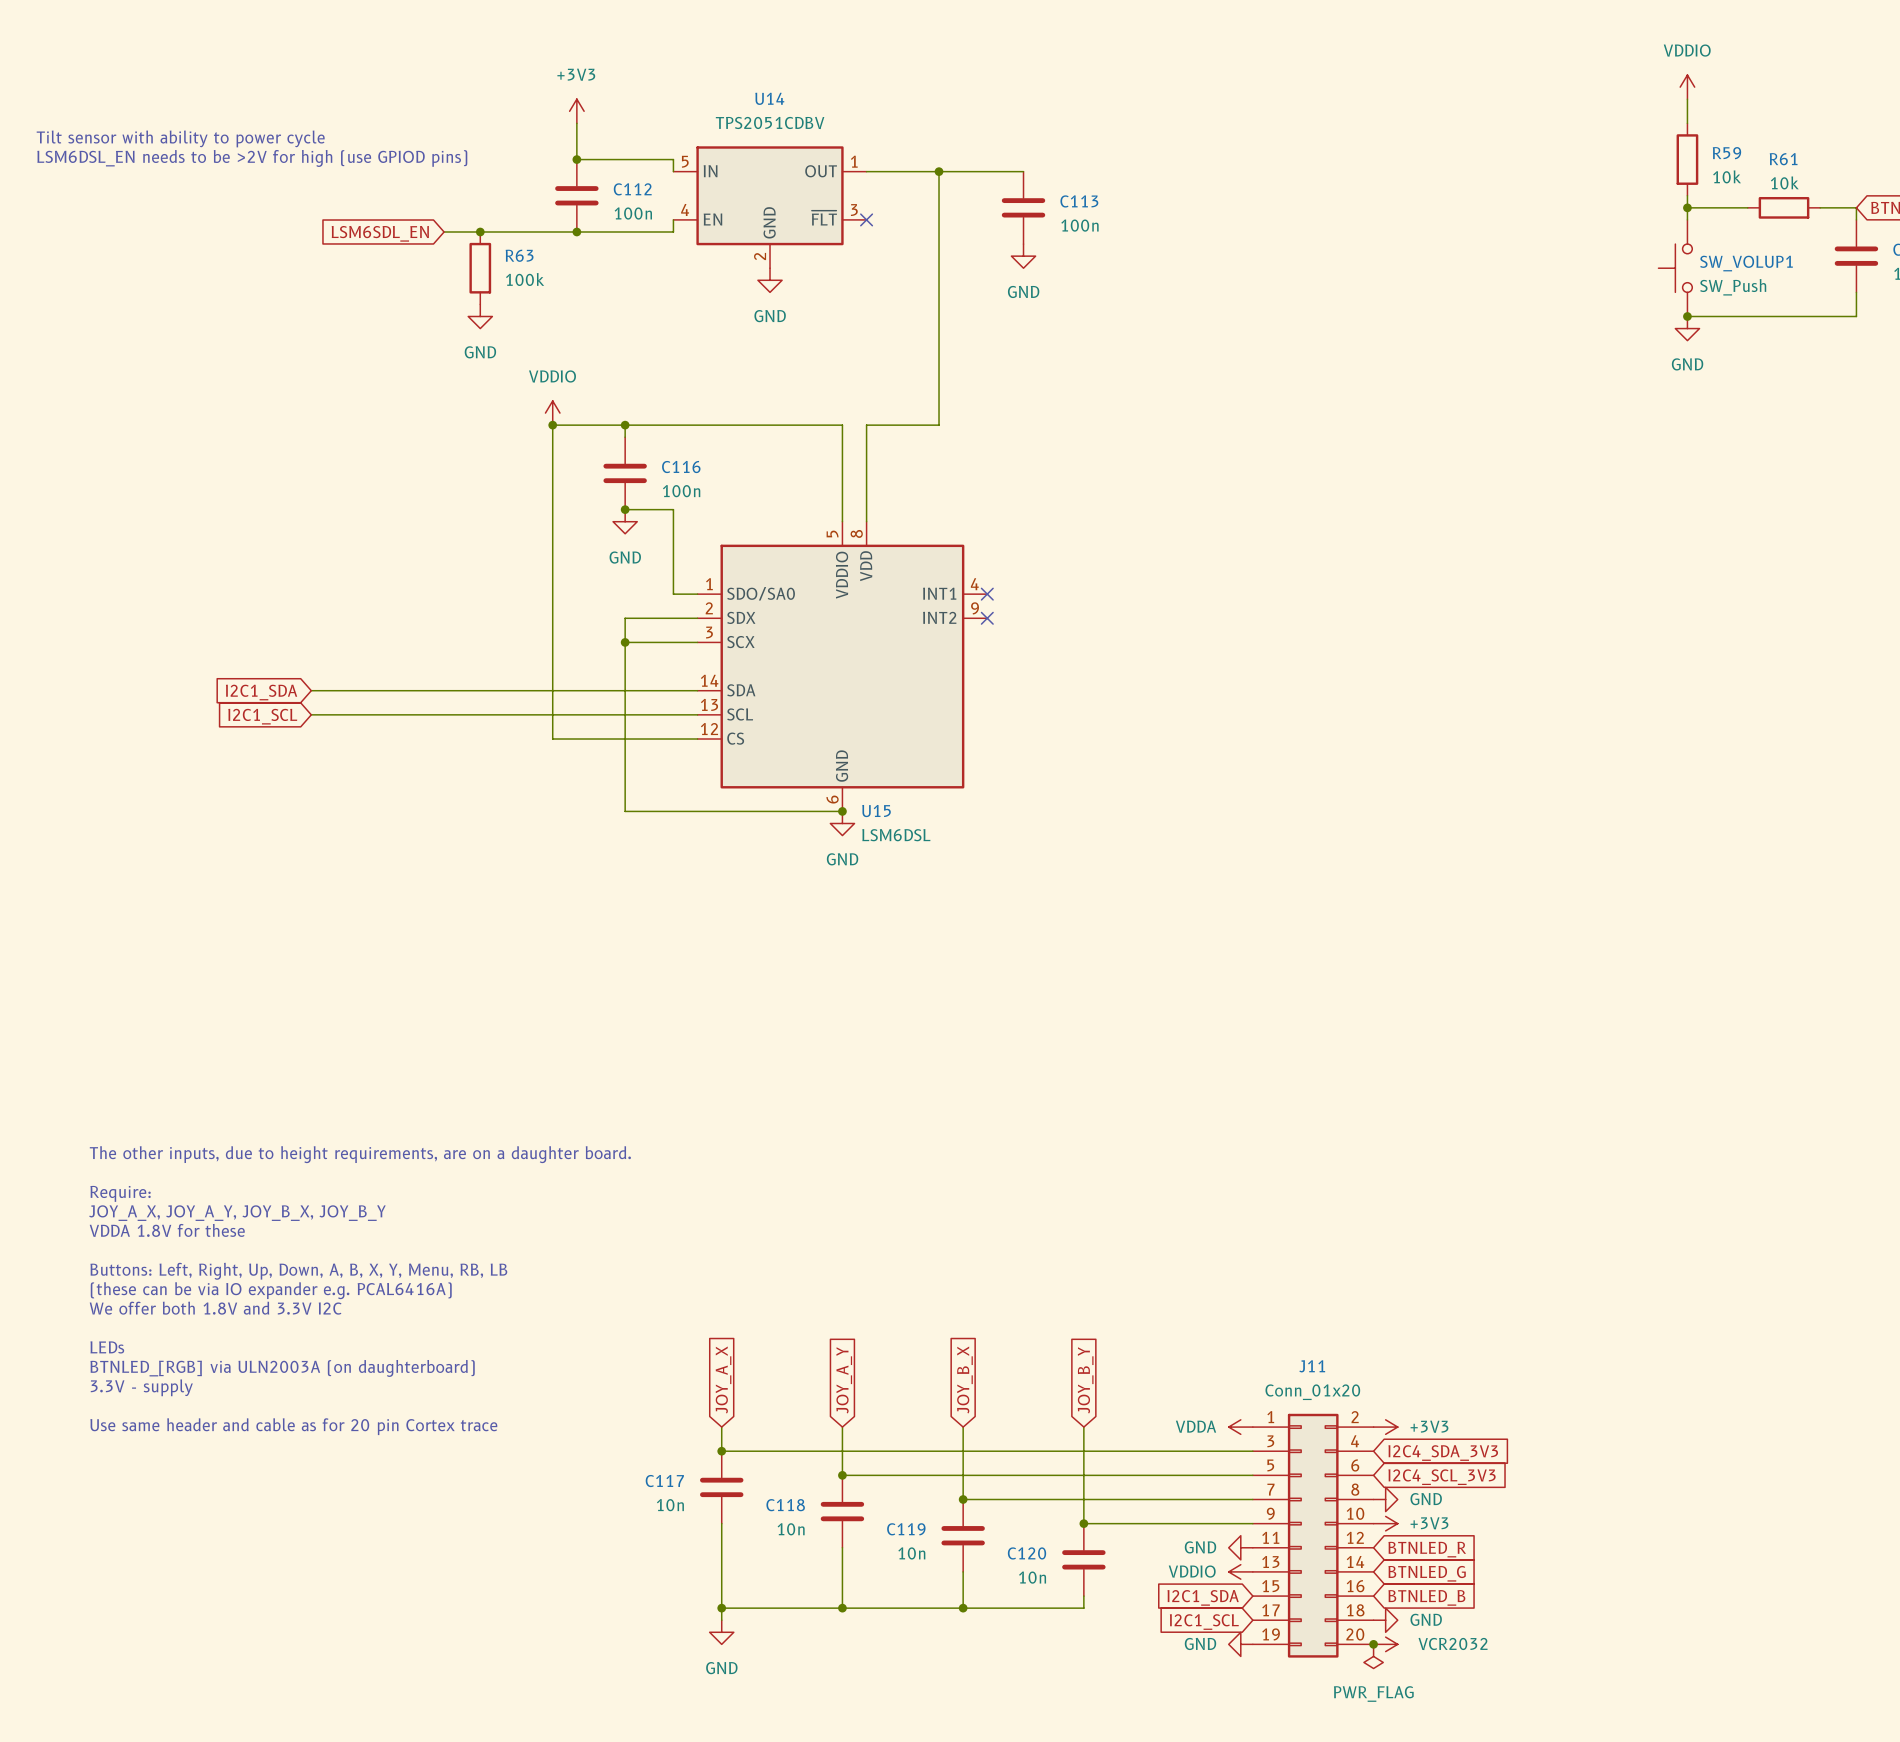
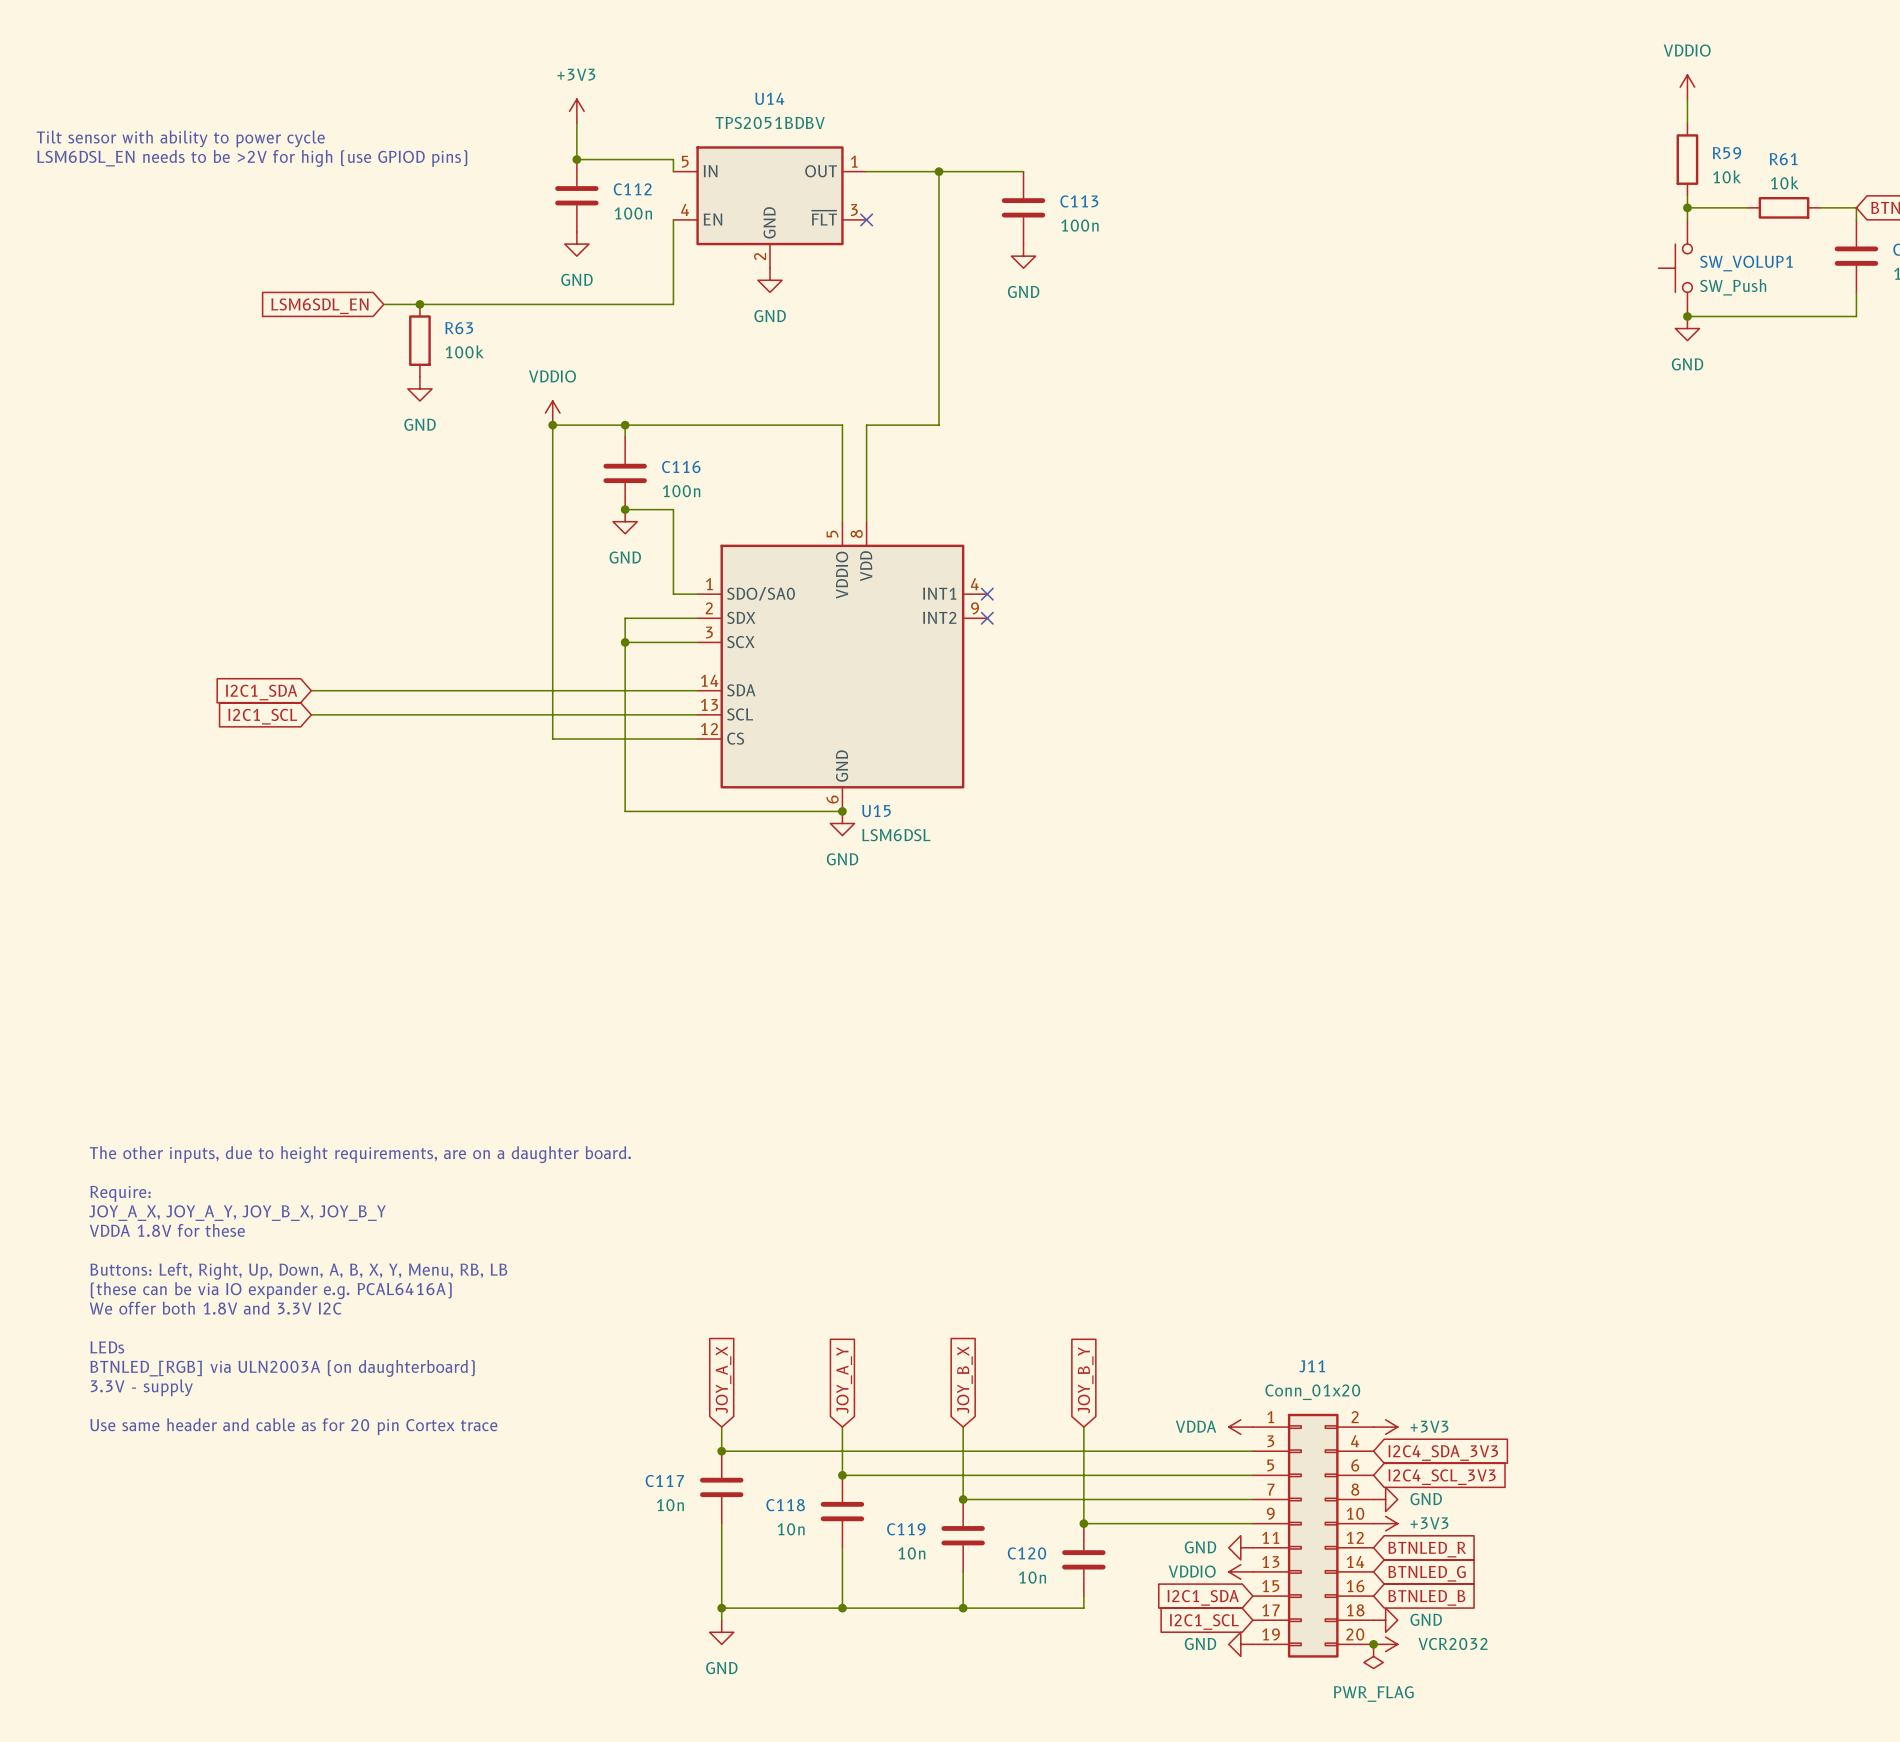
U14 value: TPS2051CDBV (770, 122) -> TPS2051BDBV (770, 122)
wire: (444, 231) (673, 231) -> (383, 304) (673, 304) (673, 231)
junction: (480, 231) -> none
junction: (576, 231) -> none
global label position: LSM6SDL_EN (380, 233) -> LSM6SDL_EN (319, 306)
power symbol: none -> GND (576, 244)
R63 position: (480, 268) -> (419, 340)
junction: none -> (419, 304)
power symbol: GND (480, 316) -> none
power symbol: none -> GND (419, 388)

